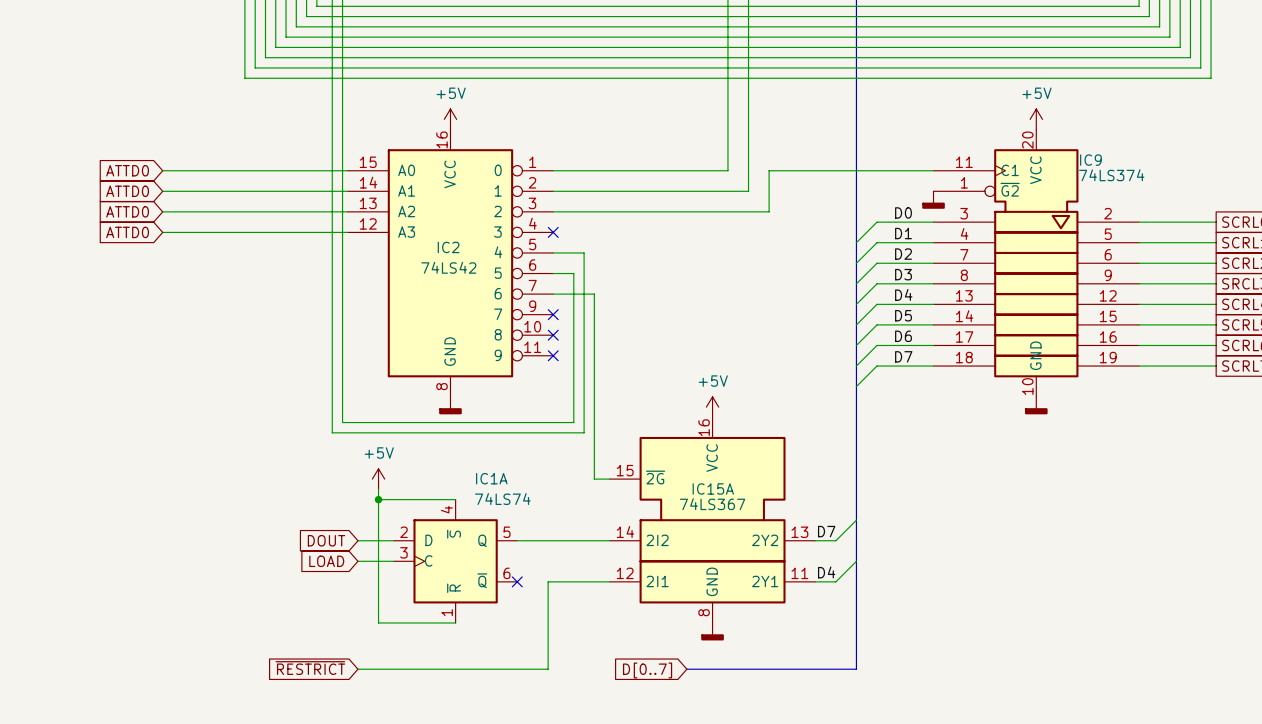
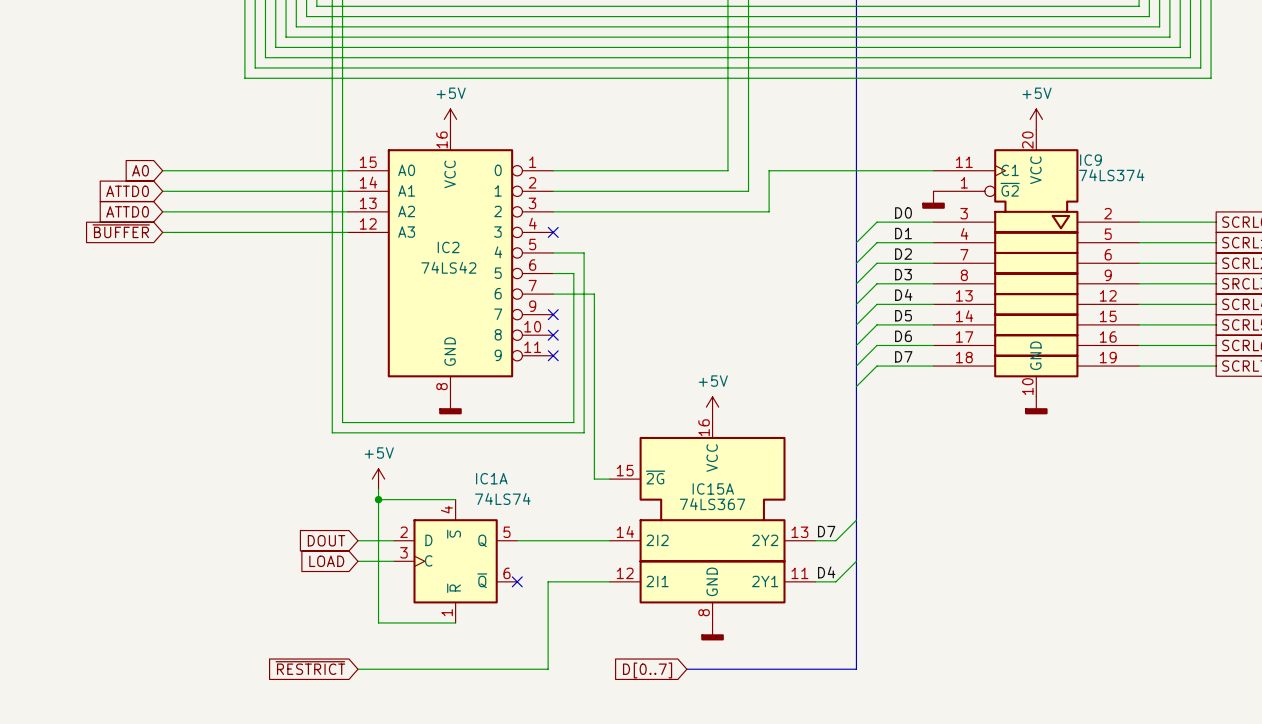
global label: ATTD0 (127, 170) -> A0 (140, 170)
global label: ATTD0 (127, 232) -> ~{BUFFER} (121, 231)

